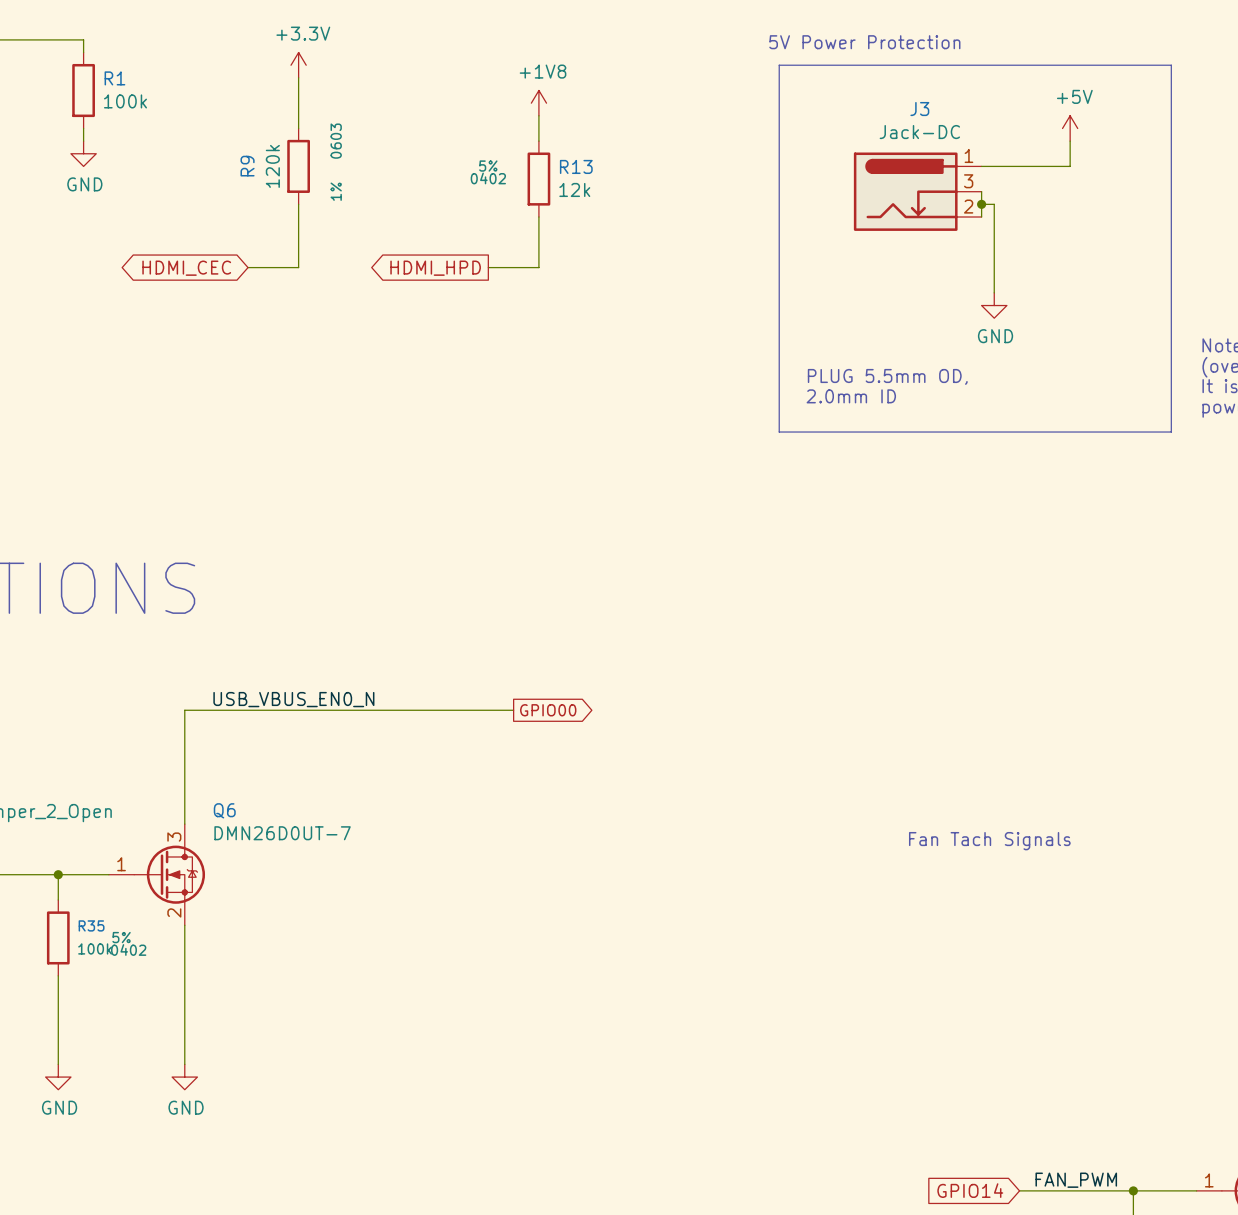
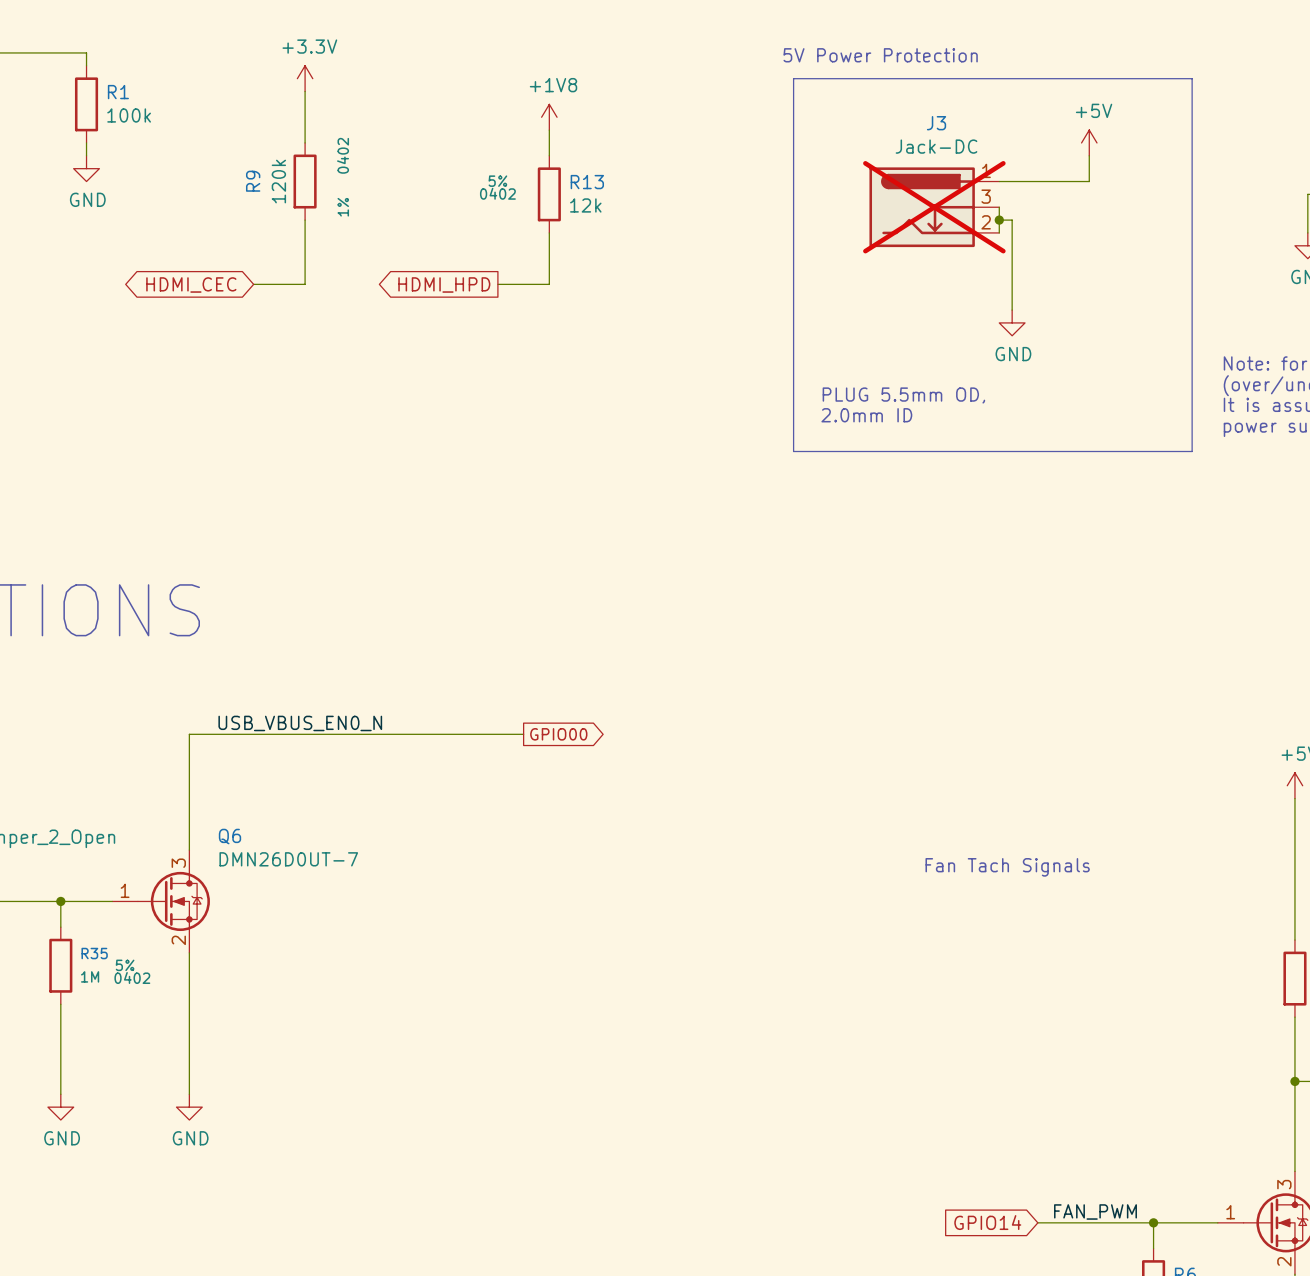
R9 text: 0603 (336, 141) -> 0402 (343, 155)
J3 do-not-place cross: none -> (934, 207)
R35 value: 100k (95, 948) -> 1M (90, 976)

